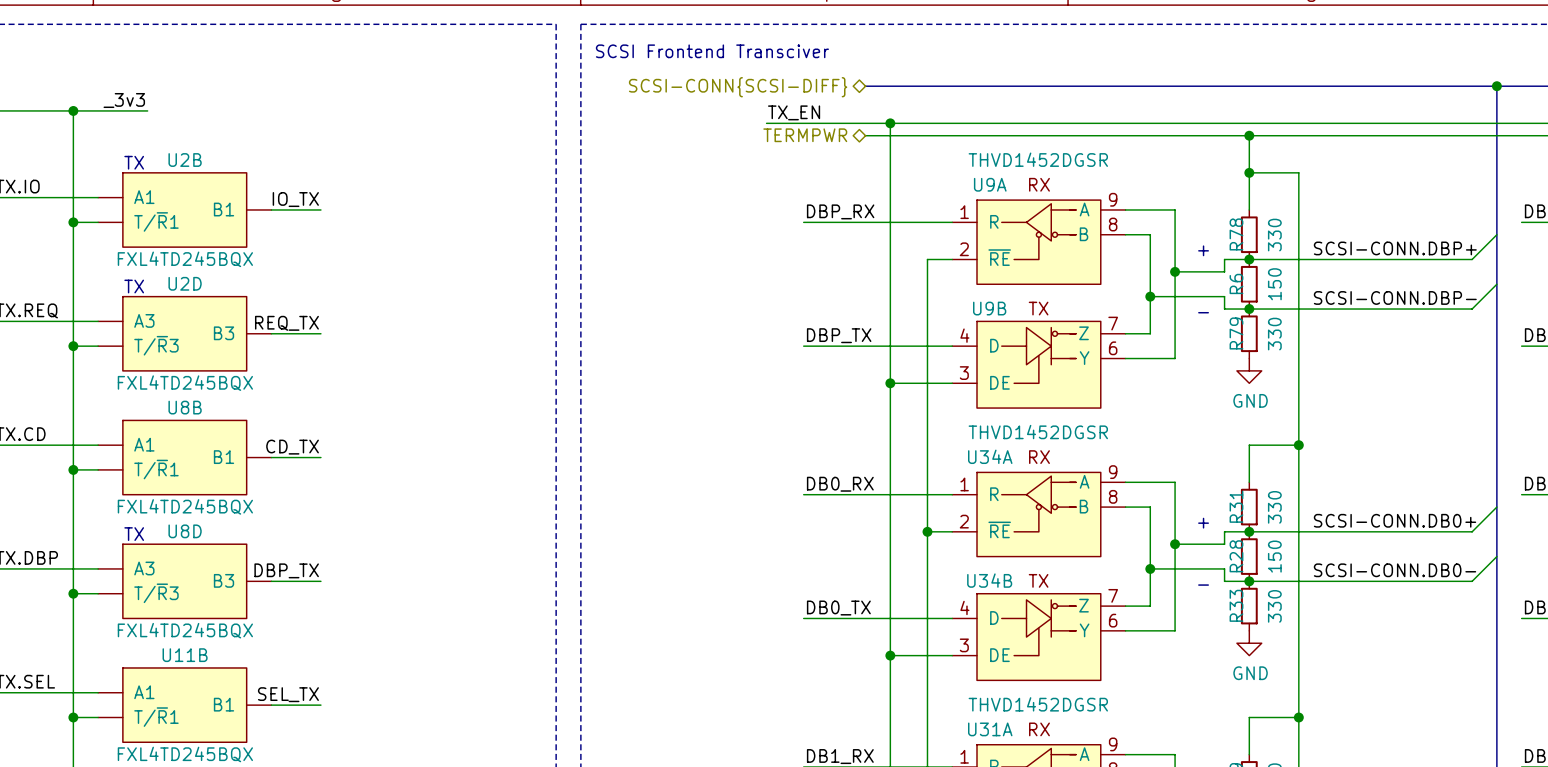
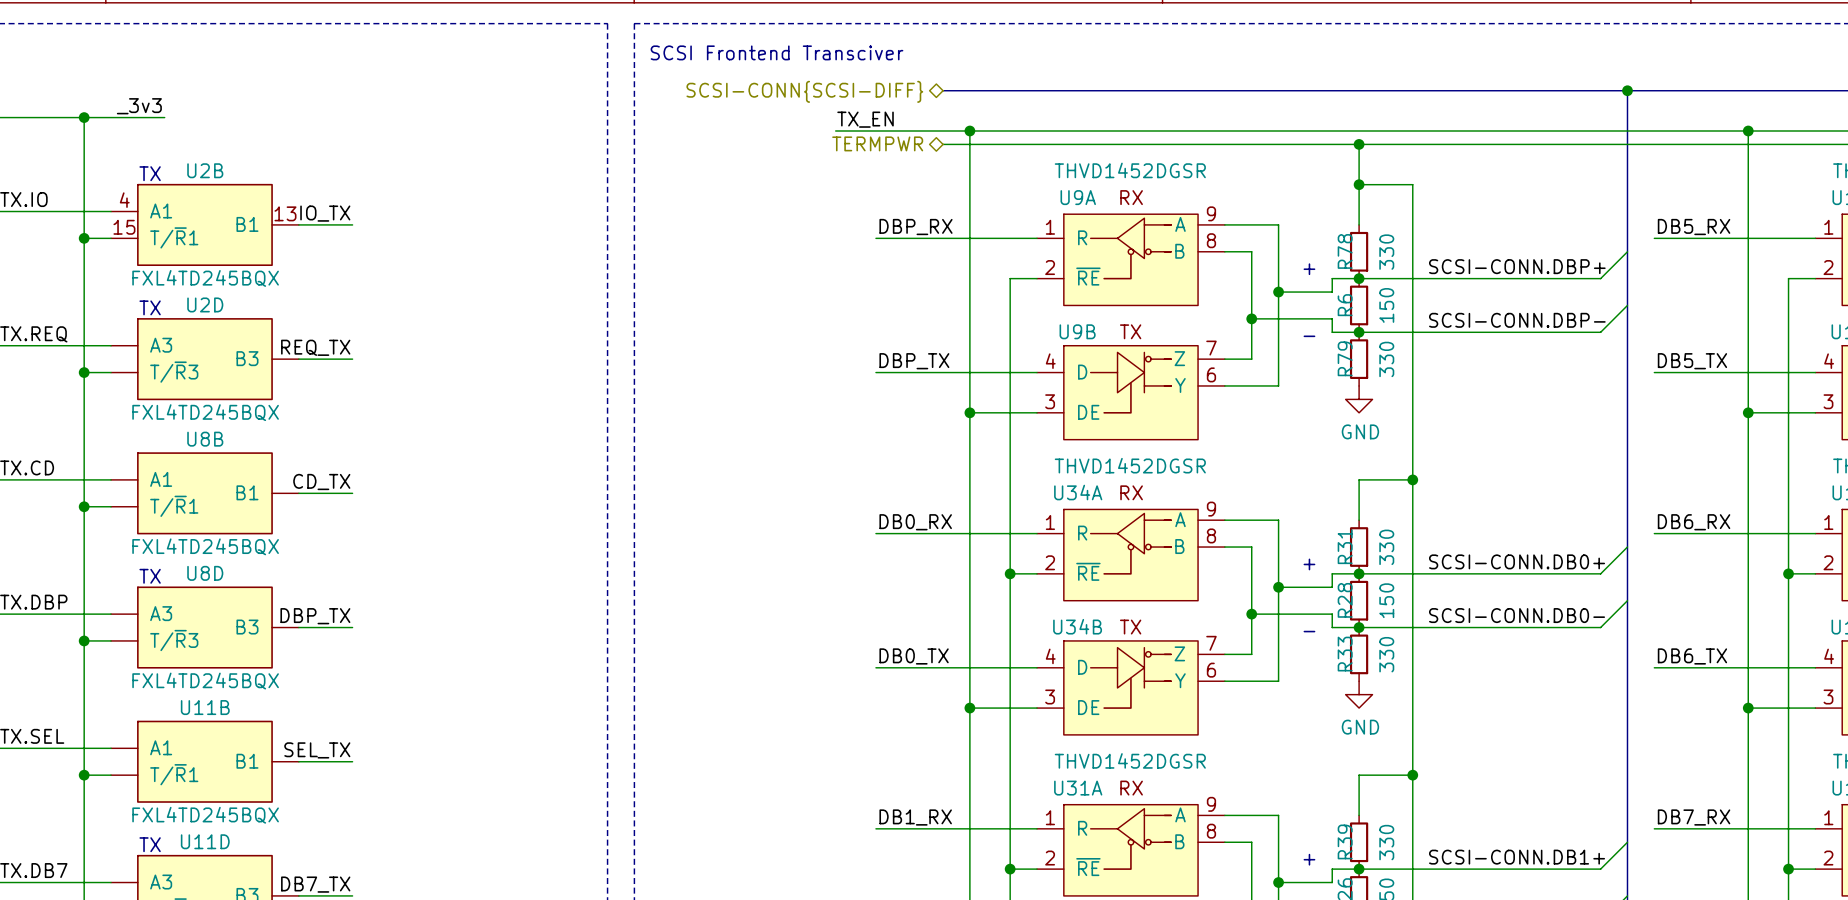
U2B pin number: none -> 4 (124, 200)
U2B pin number: none -> 13 (285, 213)
U2B pin number: none -> 15 (124, 227)

